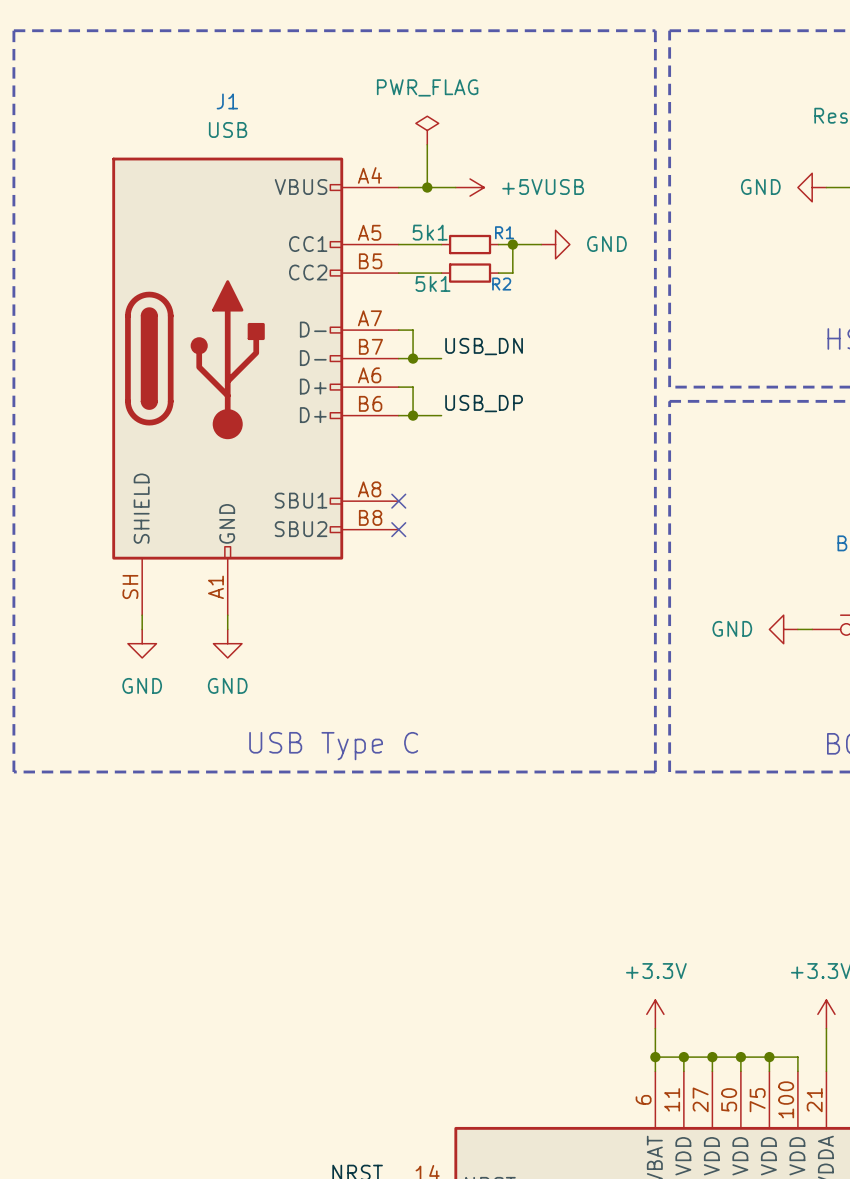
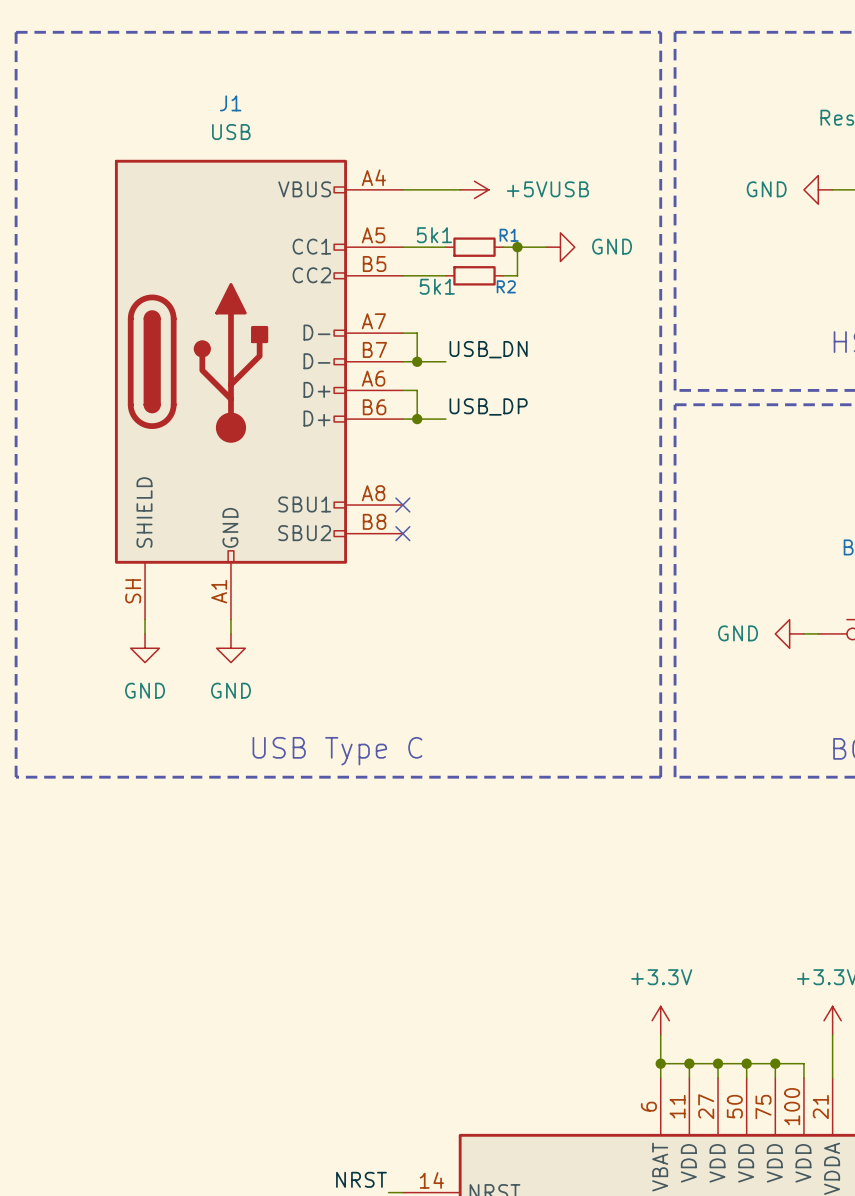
power symbol: PWR_FLAG (427, 130) -> none
wire: (427, 144) (427, 187) -> none
junction: (427, 187) -> none

